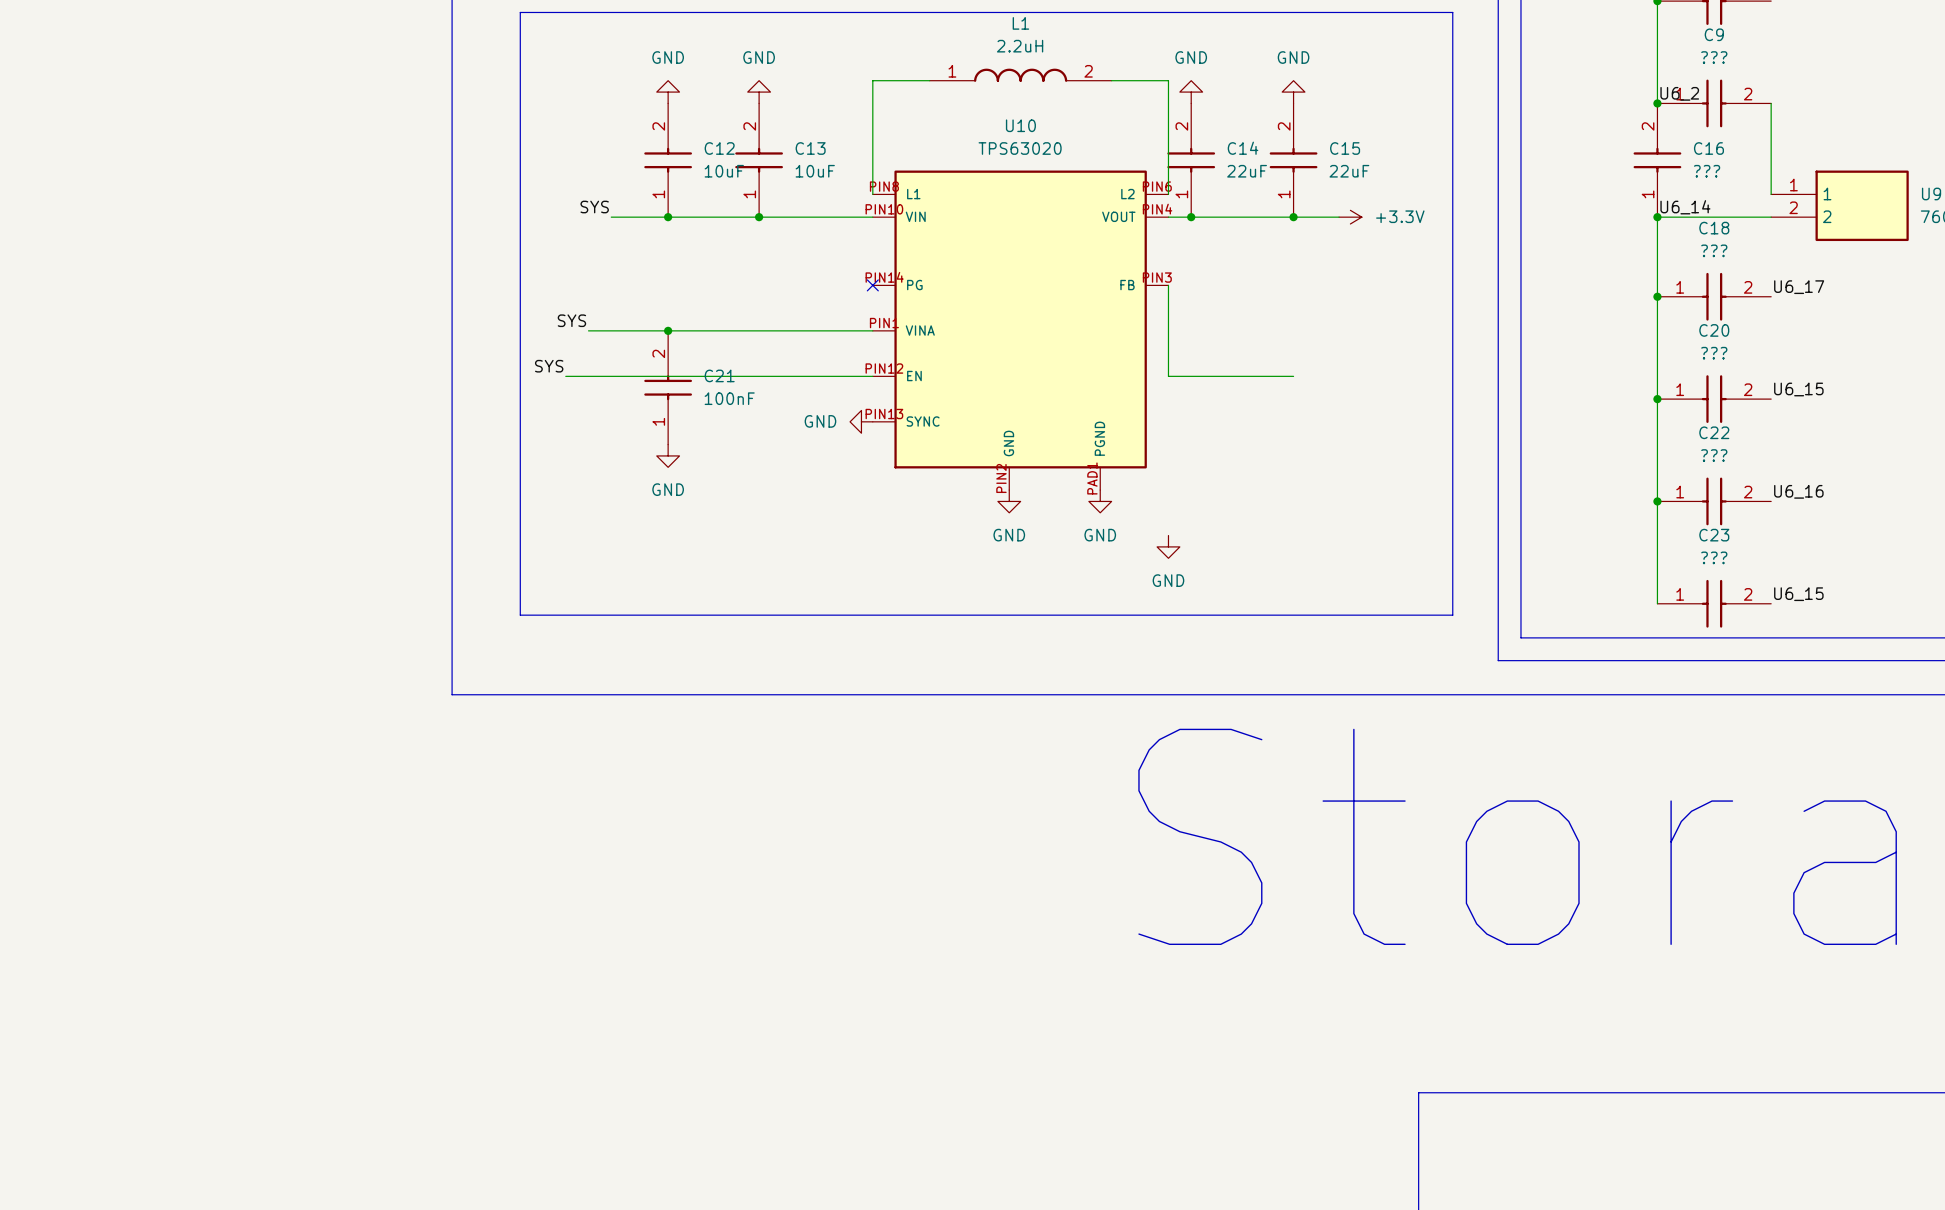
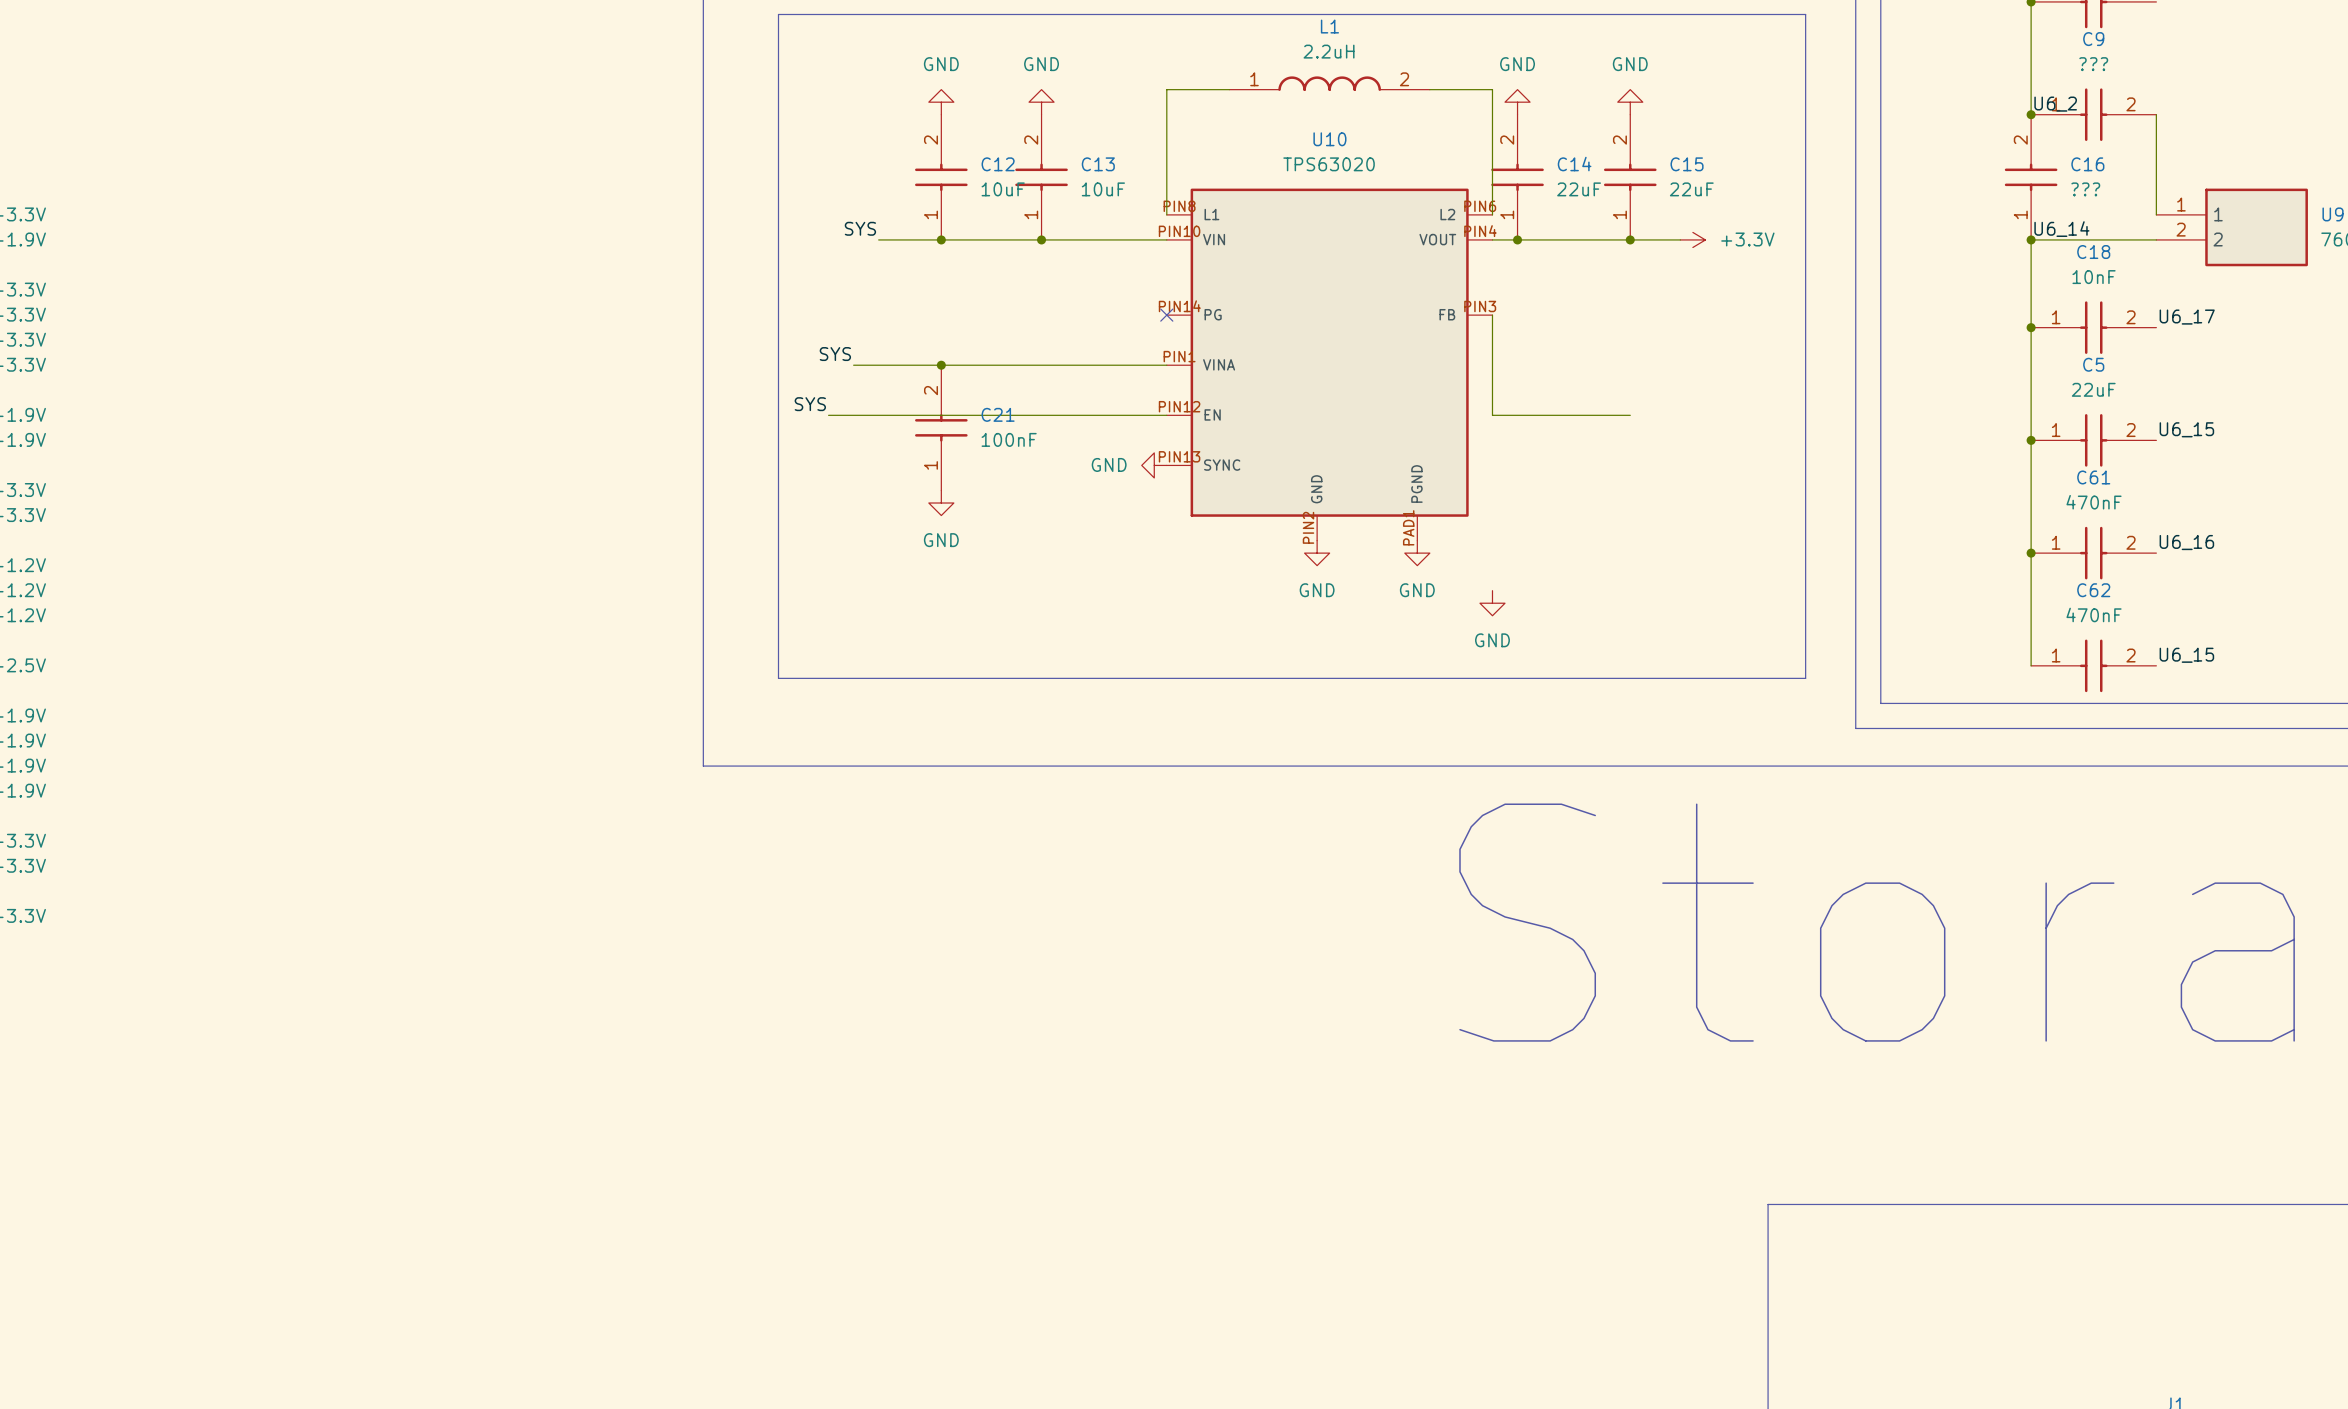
C18 value: ??? (1714, 250) -> 10nF (2094, 277)
C20 name: C20 (1714, 330) -> C5 (2093, 364)
C20 value: ??? (1714, 353) -> 22uF (2093, 389)
C22 name: C22 (1714, 432) -> C61 (2093, 477)
C22 value: ??? (1714, 455) -> 470nF (2094, 502)
C23 name: C23 (1714, 535) -> C62 (2093, 590)
C23 value: ??? (1714, 557) -> 470nF (2094, 614)

